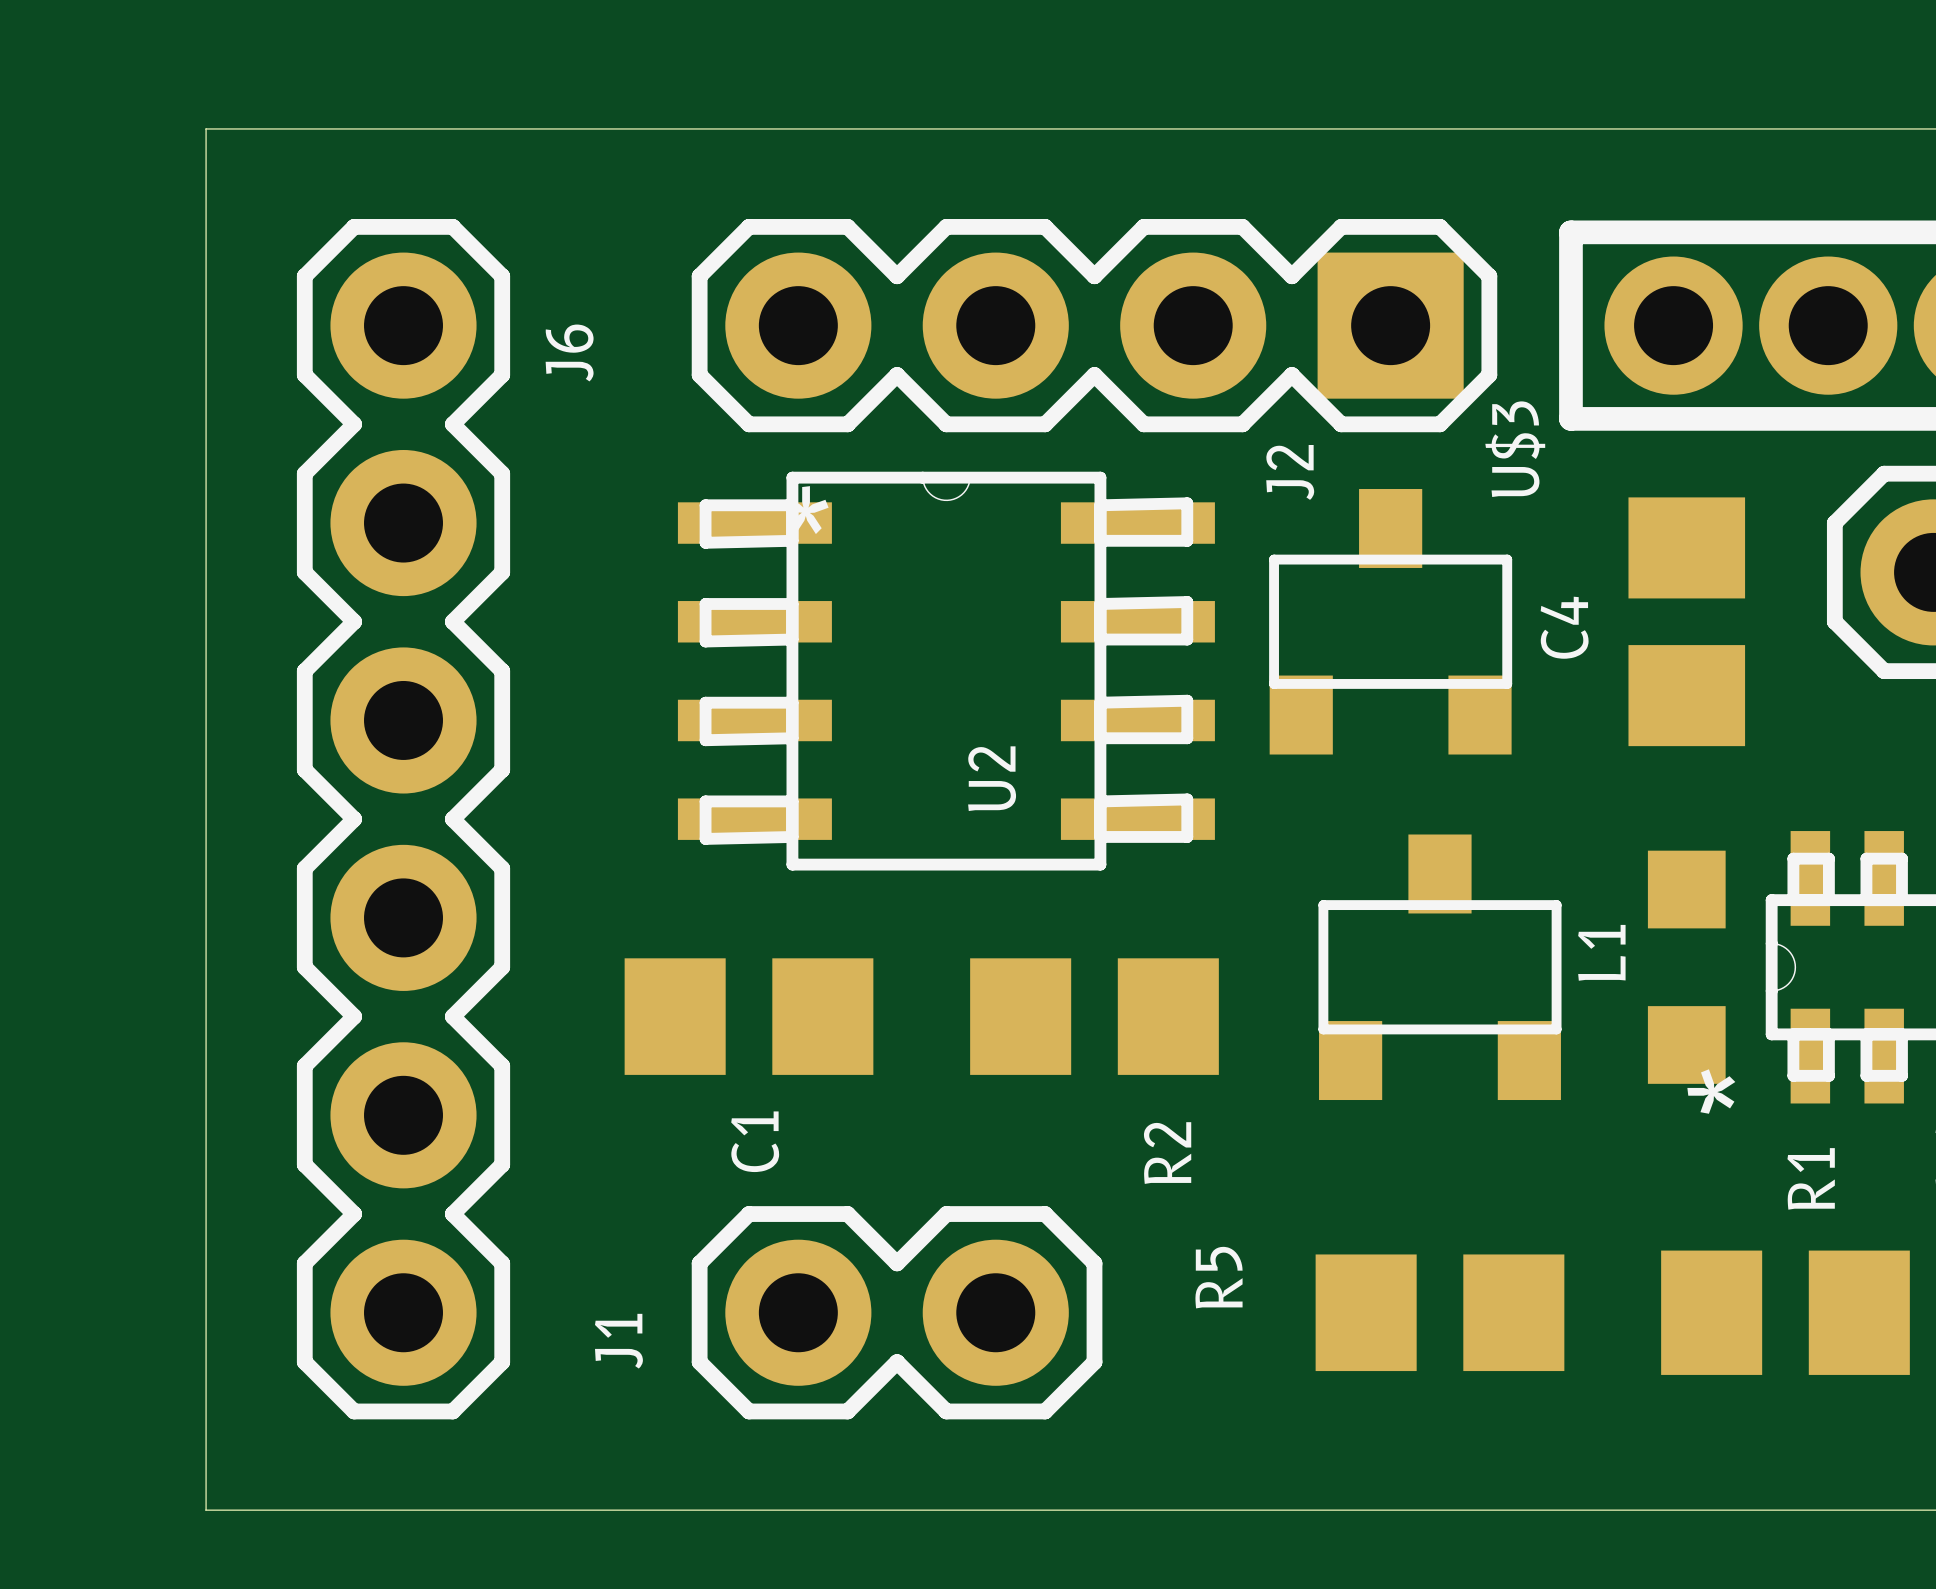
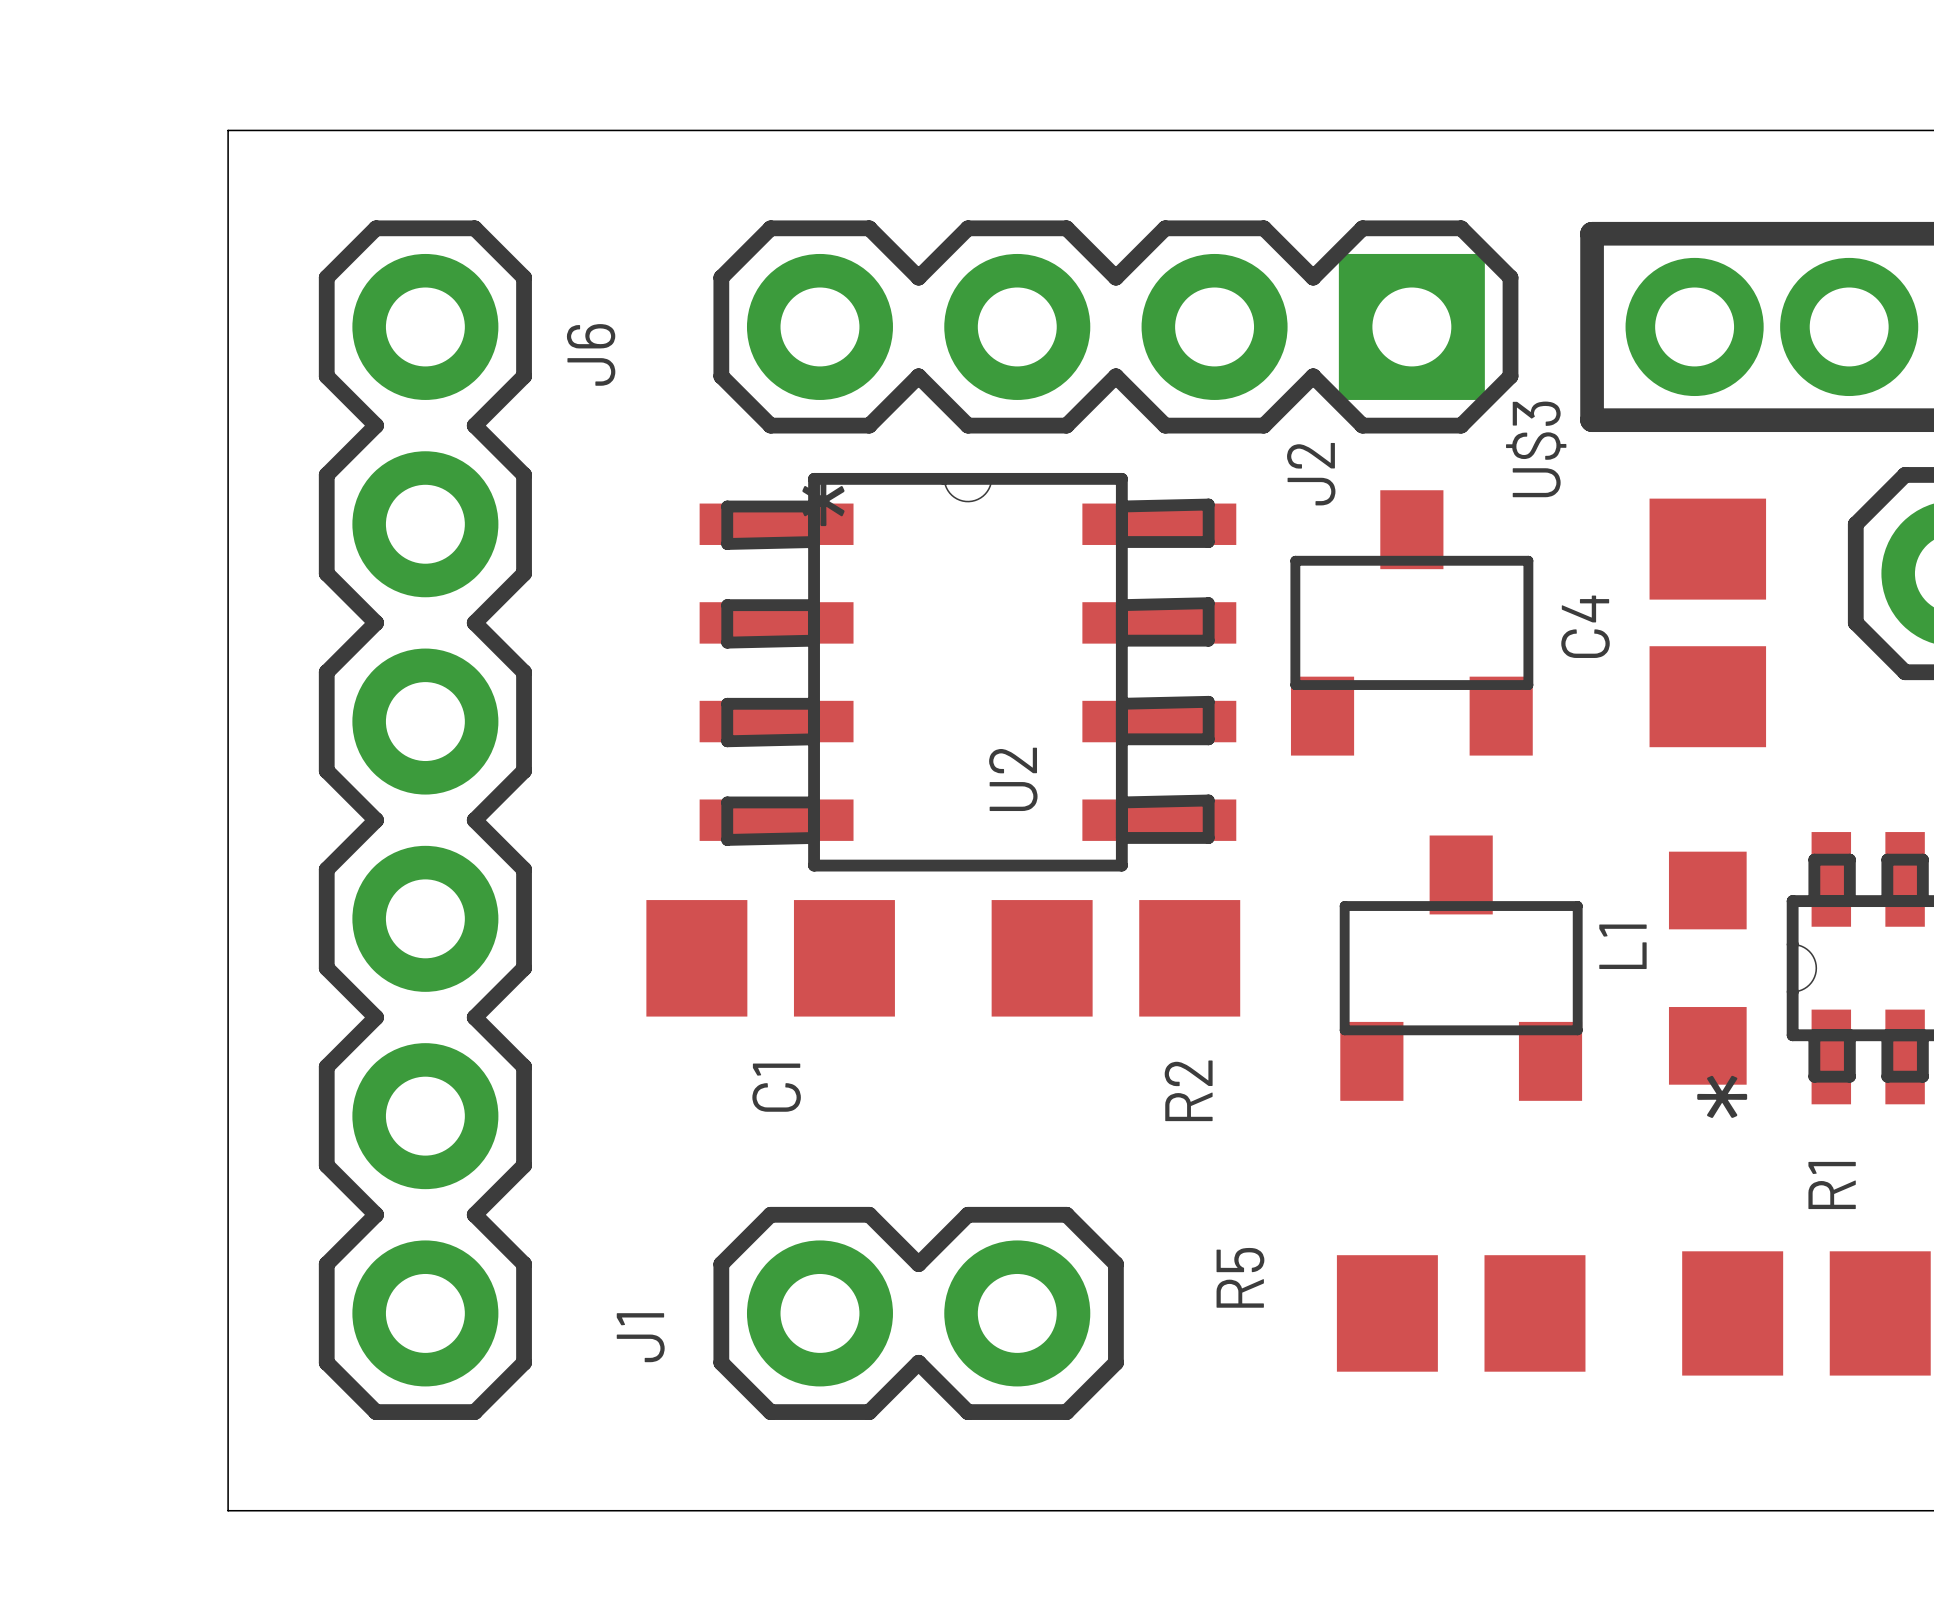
C1 position: (748, 1016) -> (770, 958)
R2 position: (1094, 1016) -> (1115, 958)

